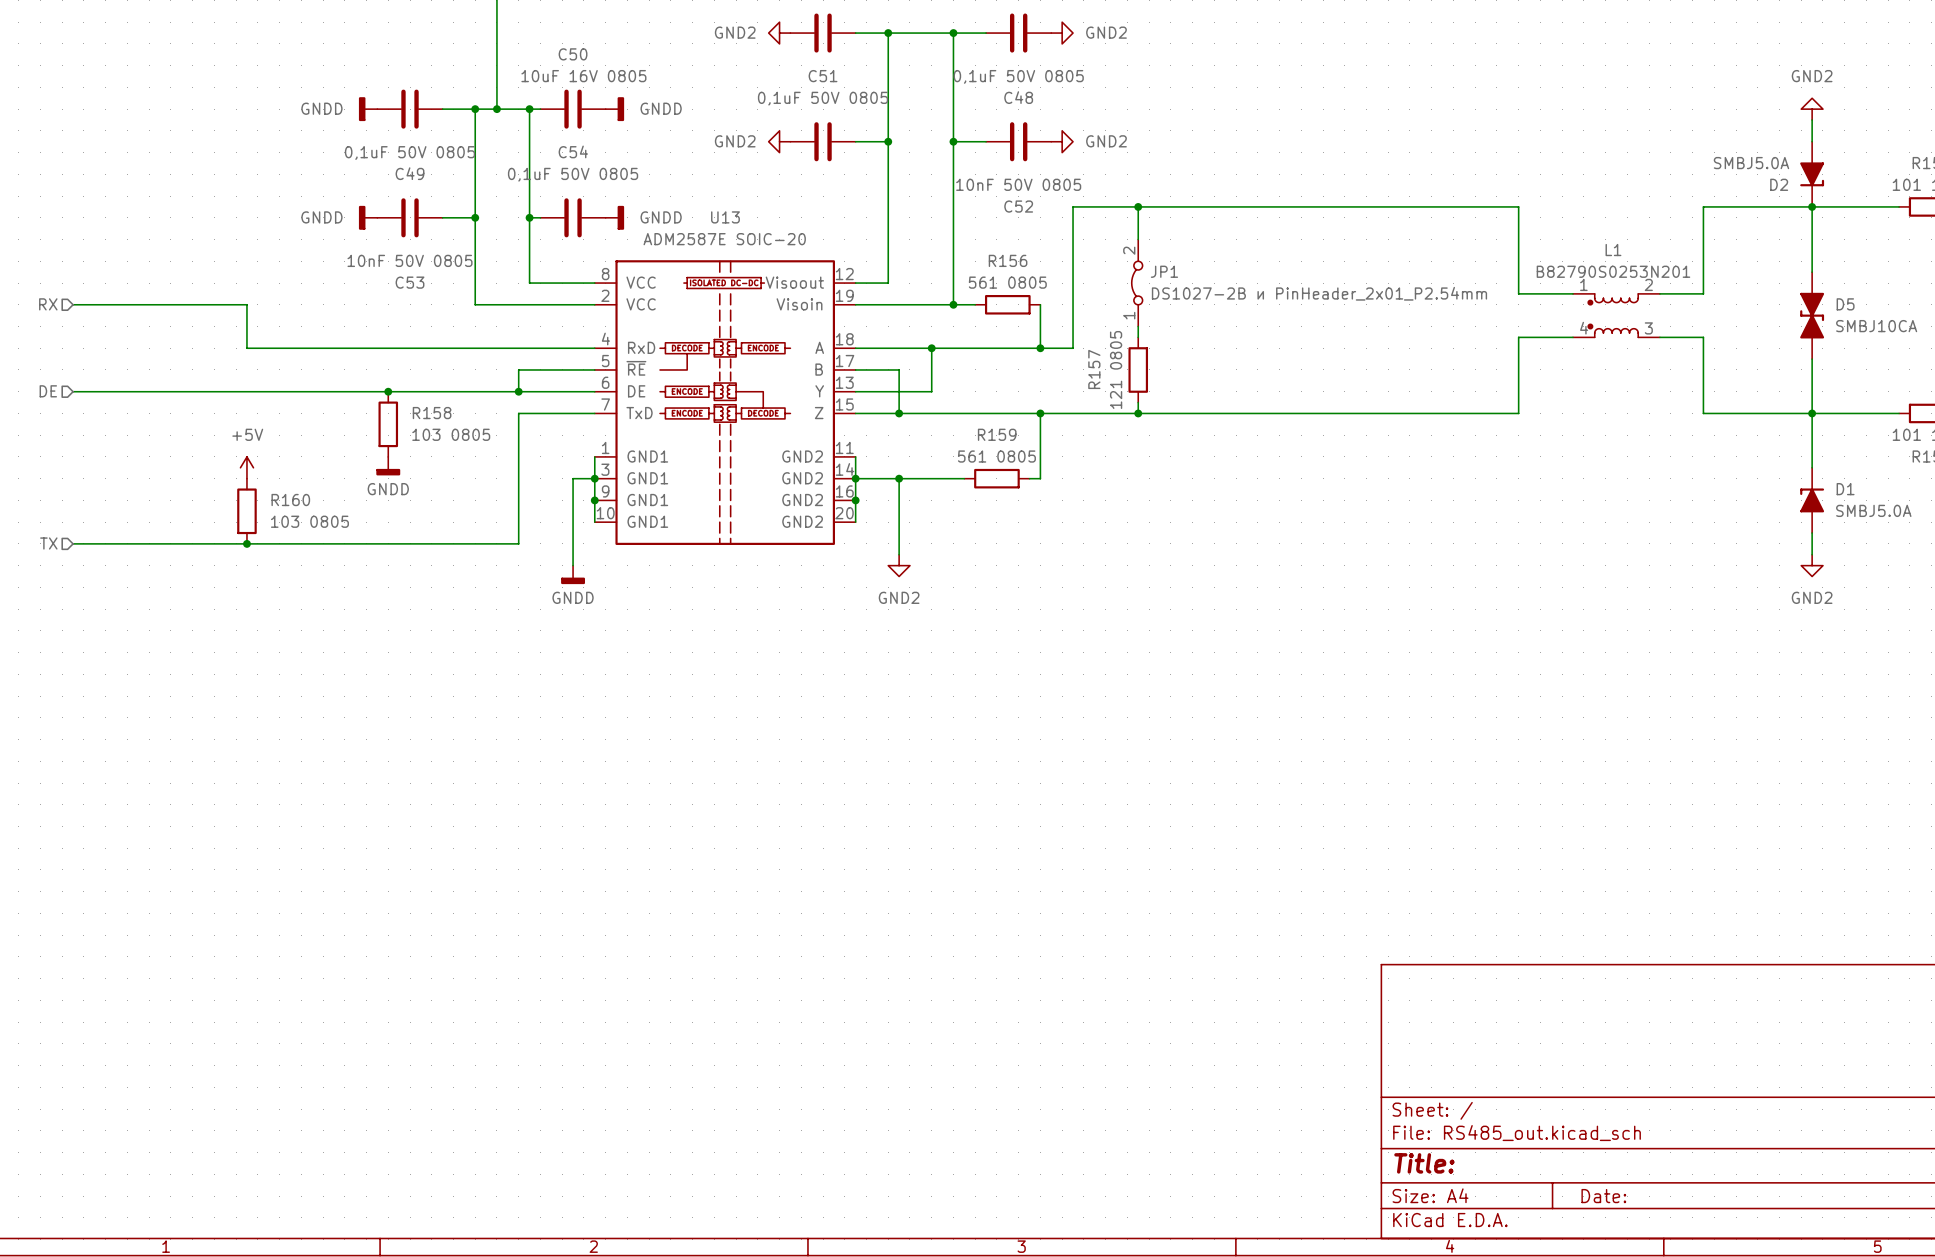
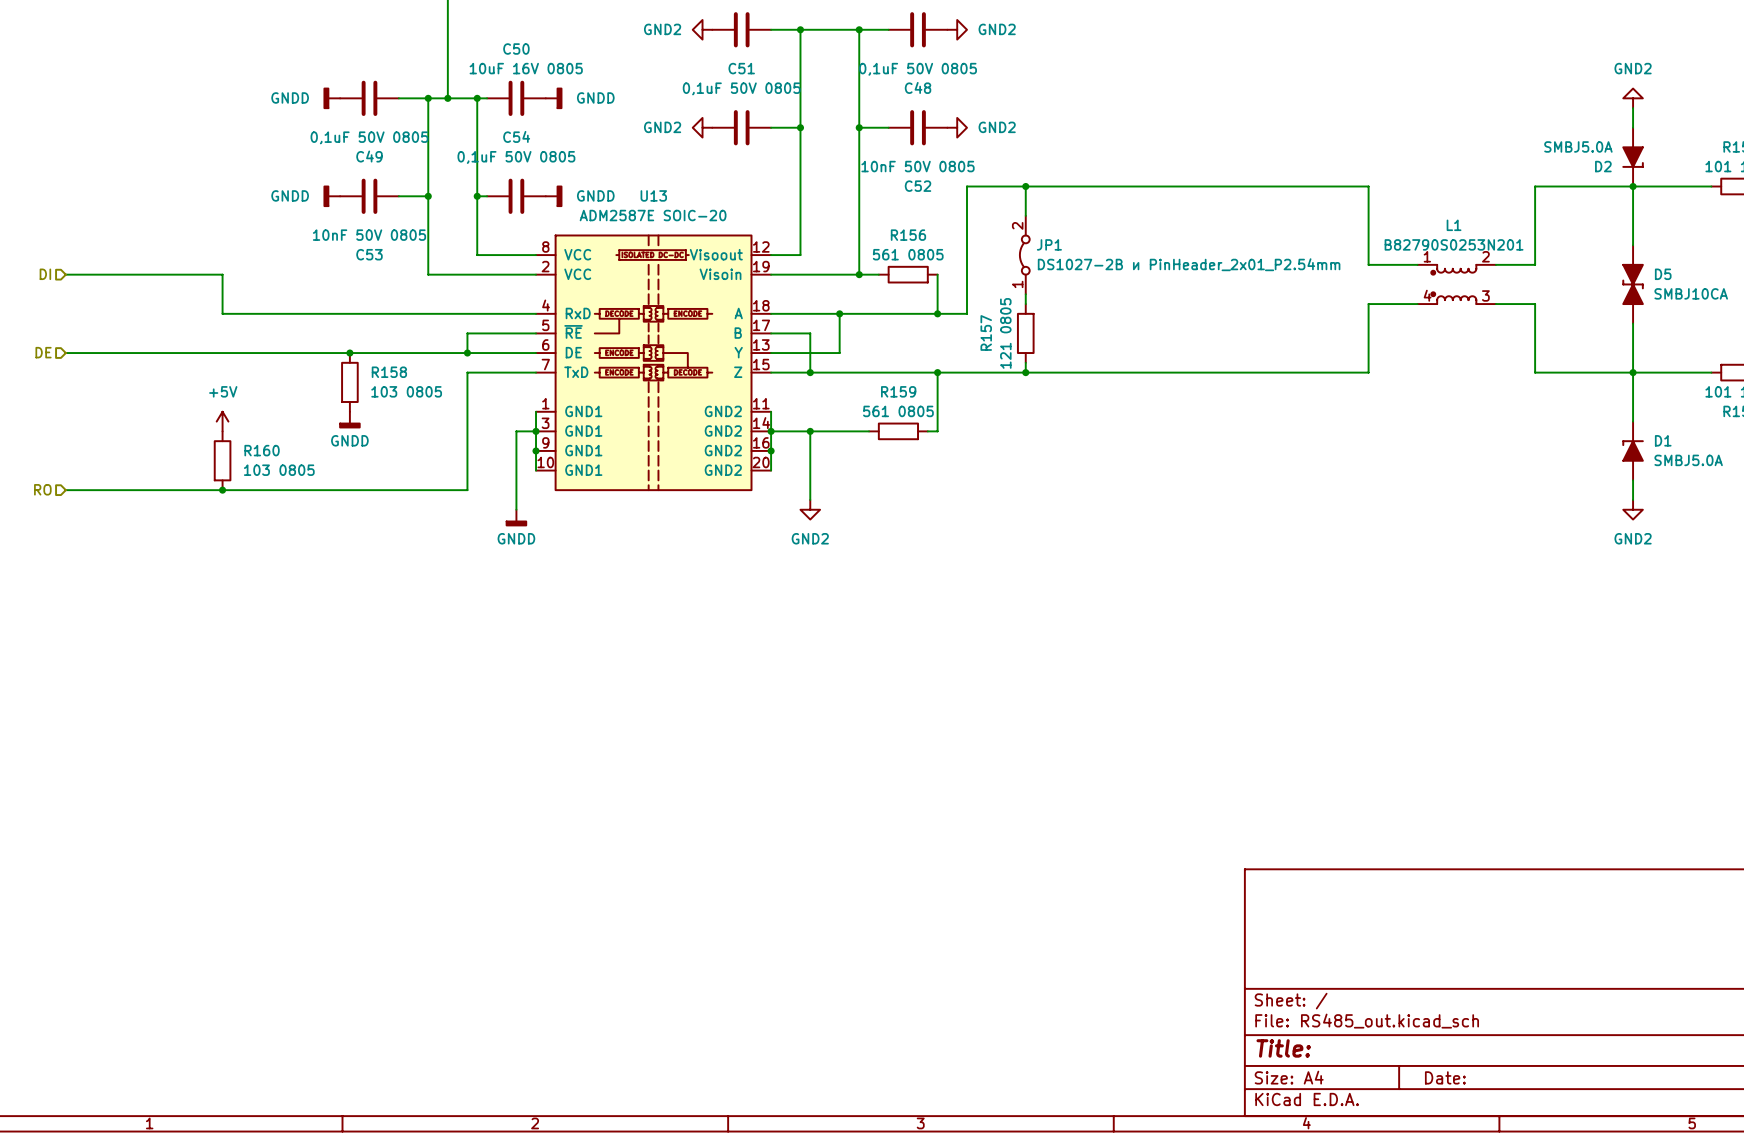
hierarchical label: RX (48, 304) -> DI (45, 274)
hierarchical label: TX (48, 543) -> RO (42, 489)

